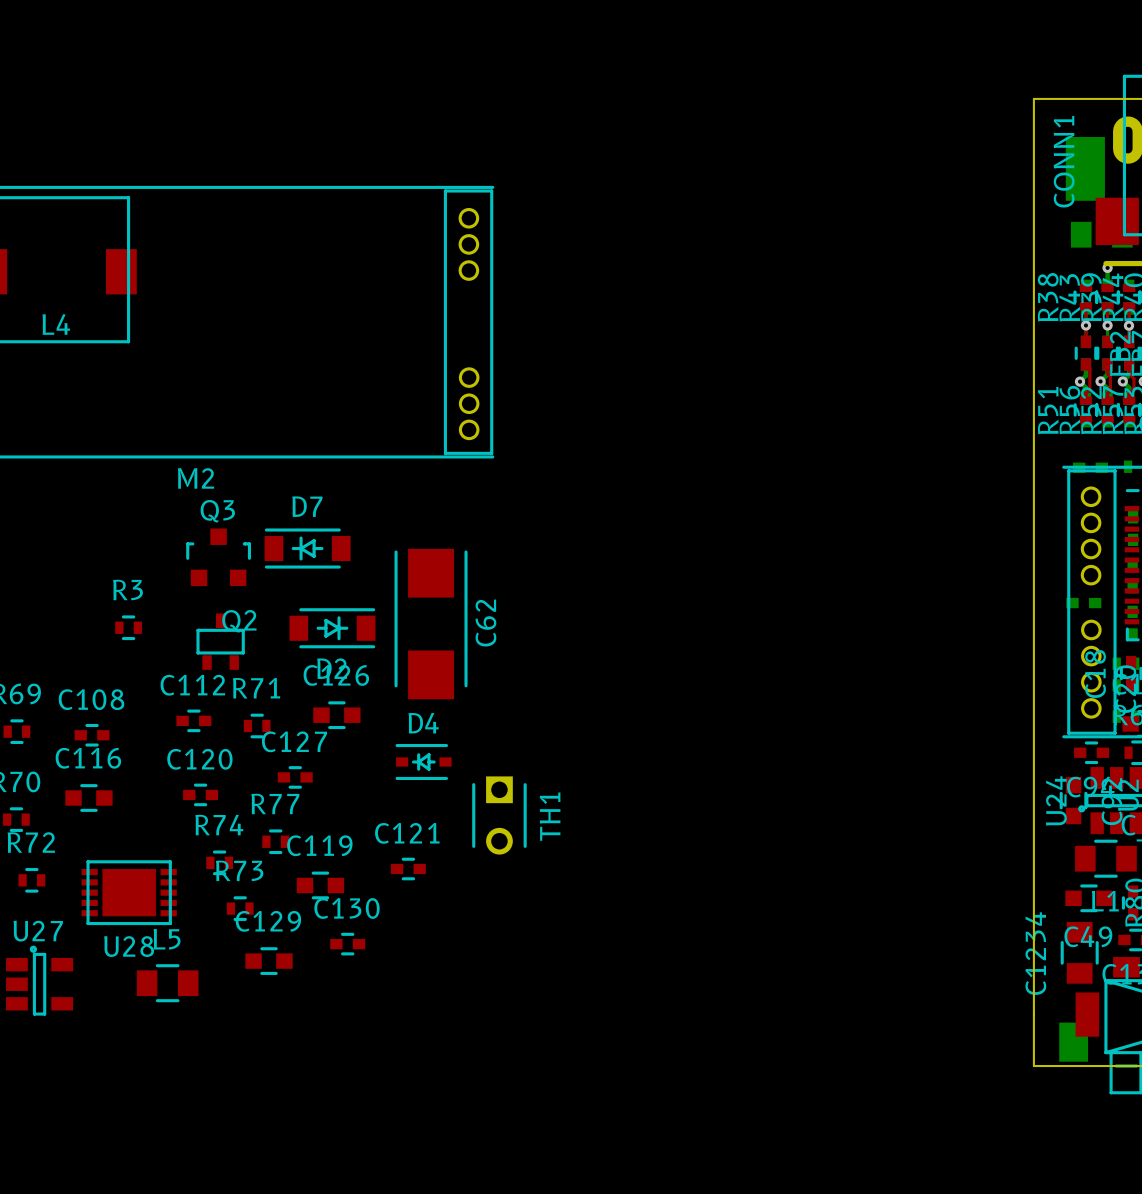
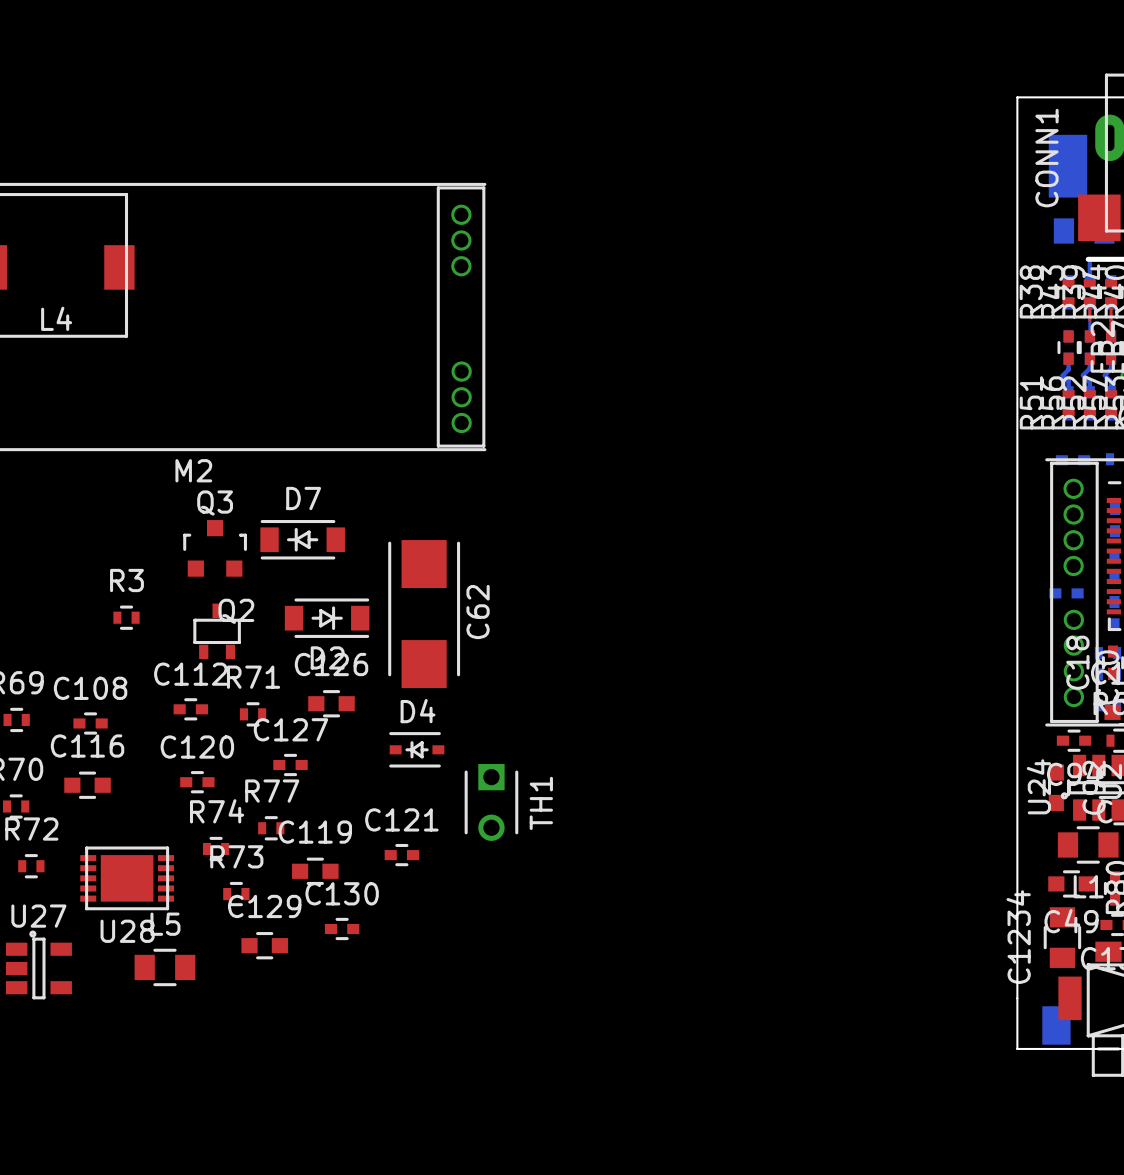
via: (1107, 267) -> none
via: (1085, 325) -> none
via: (1107, 325) -> none
via: (1128, 325) -> none
top track: (1085, 364) (1089, 368) (1089, 389) (1085, 393) (1085, 400) -> none
top track: (1107, 364) (1107, 373) (1110, 376) (1110, 390) (1107, 393) (1107, 400) -> none
top track: (1129, 364) (1129, 373) (1133, 378) (1133, 388) (1129, 393) (1129, 400) -> none
via: (1080, 381) -> none
via: (1100, 381) -> none
via: (1122, 381) -> none

